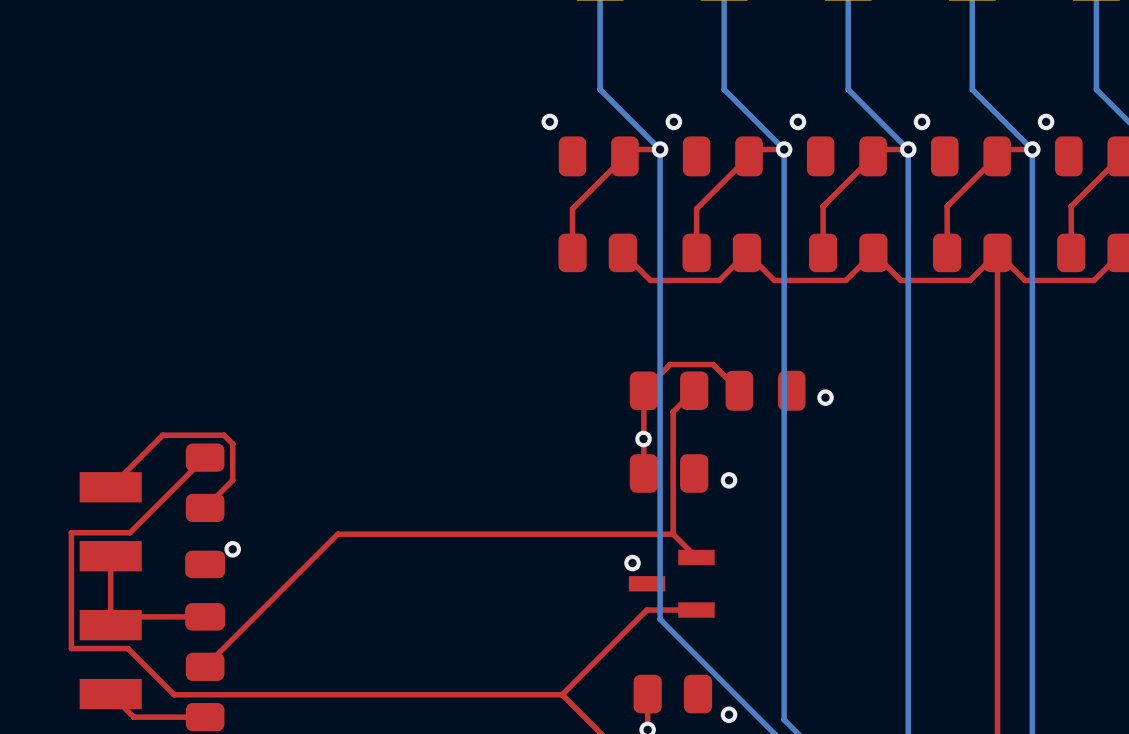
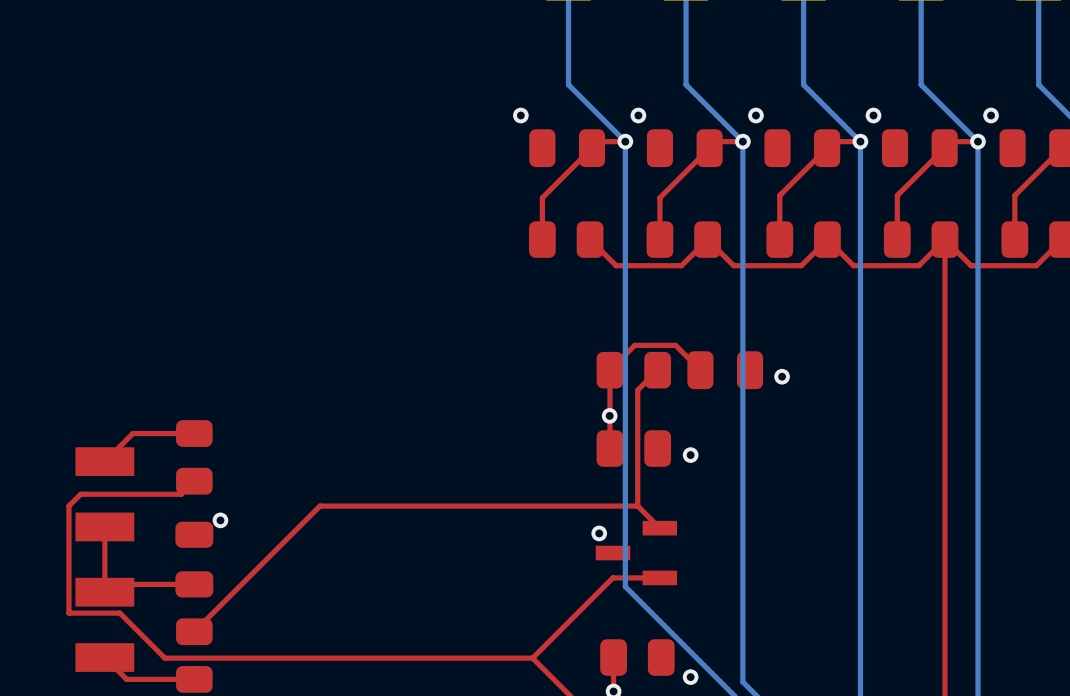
top track: (140, 457) (162, 435) (224, 435) (232, 443) (232, 480) (205, 507) -> (132, 433) (194, 433)
top track: (205, 457) (130, 532) (71, 532) (71, 648) (127, 648) -> (194, 481) (181, 494) (80, 494) (68, 506) (68, 613) (121, 614)

